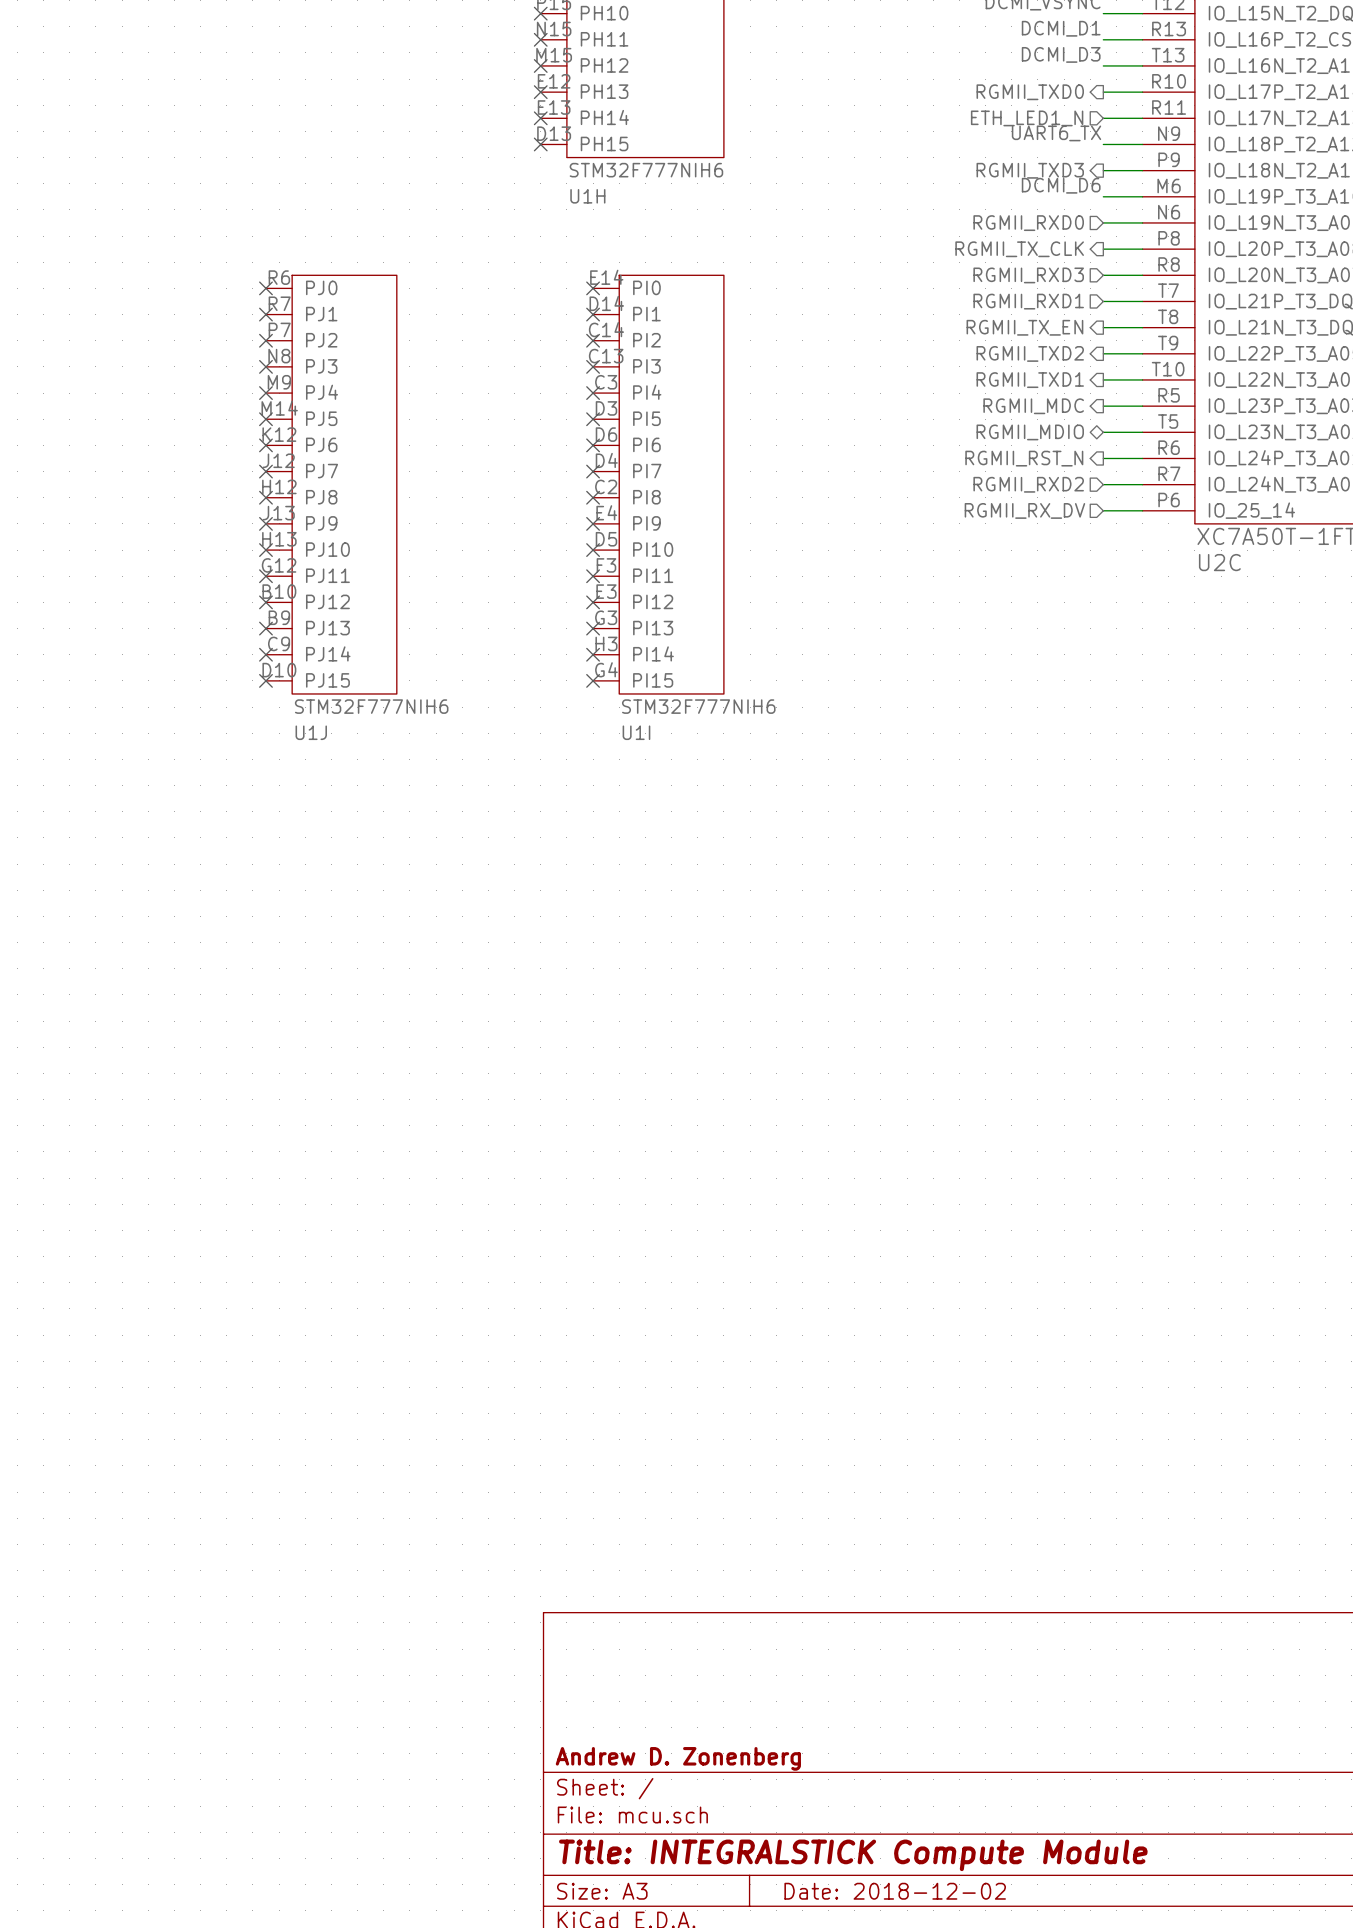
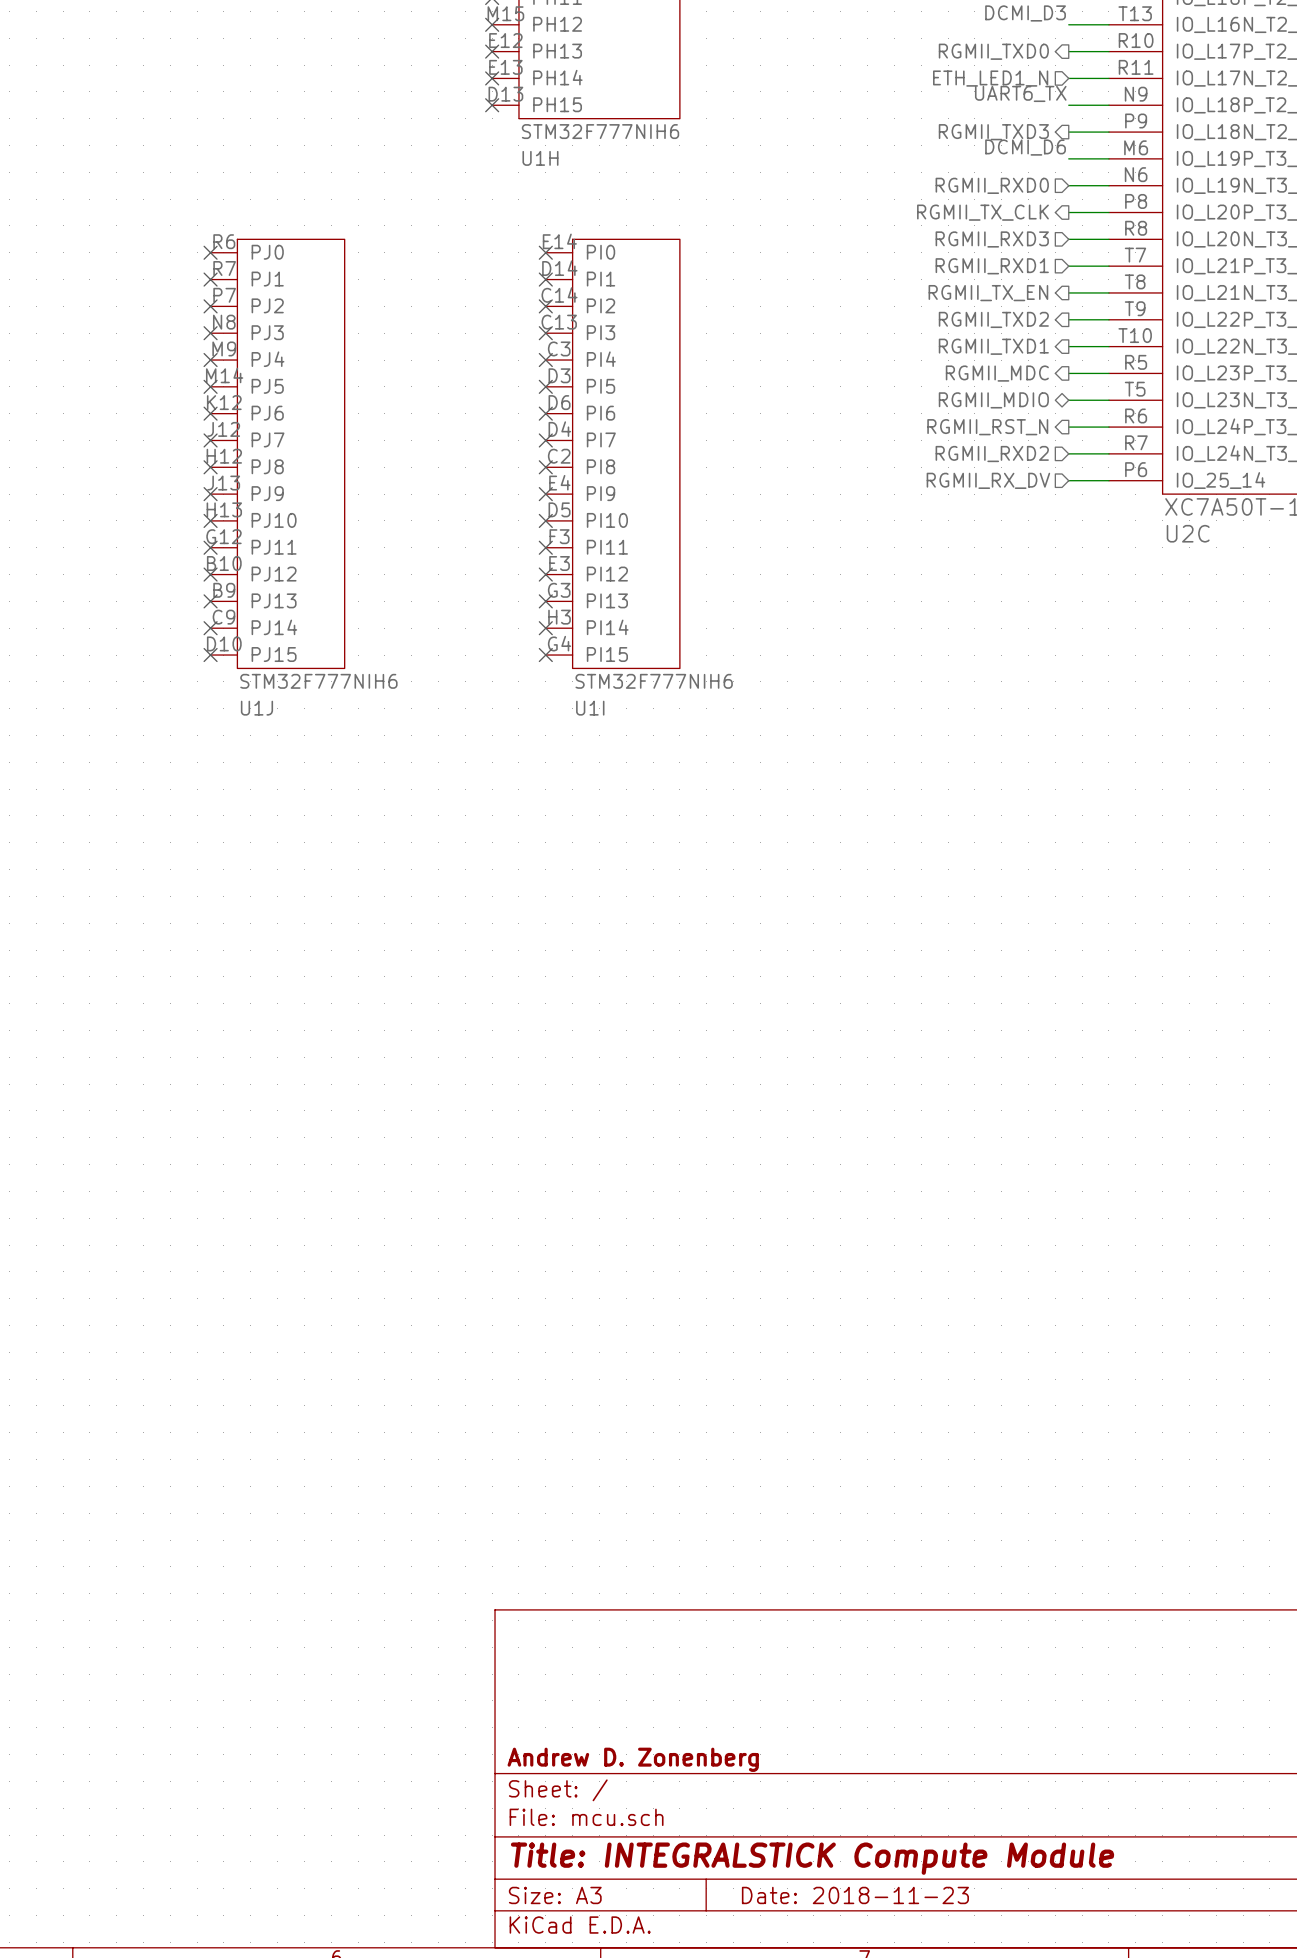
title block: Date: 2018-12-02 (895, 1891) -> Date: 2018-11-23 (855, 1895)

